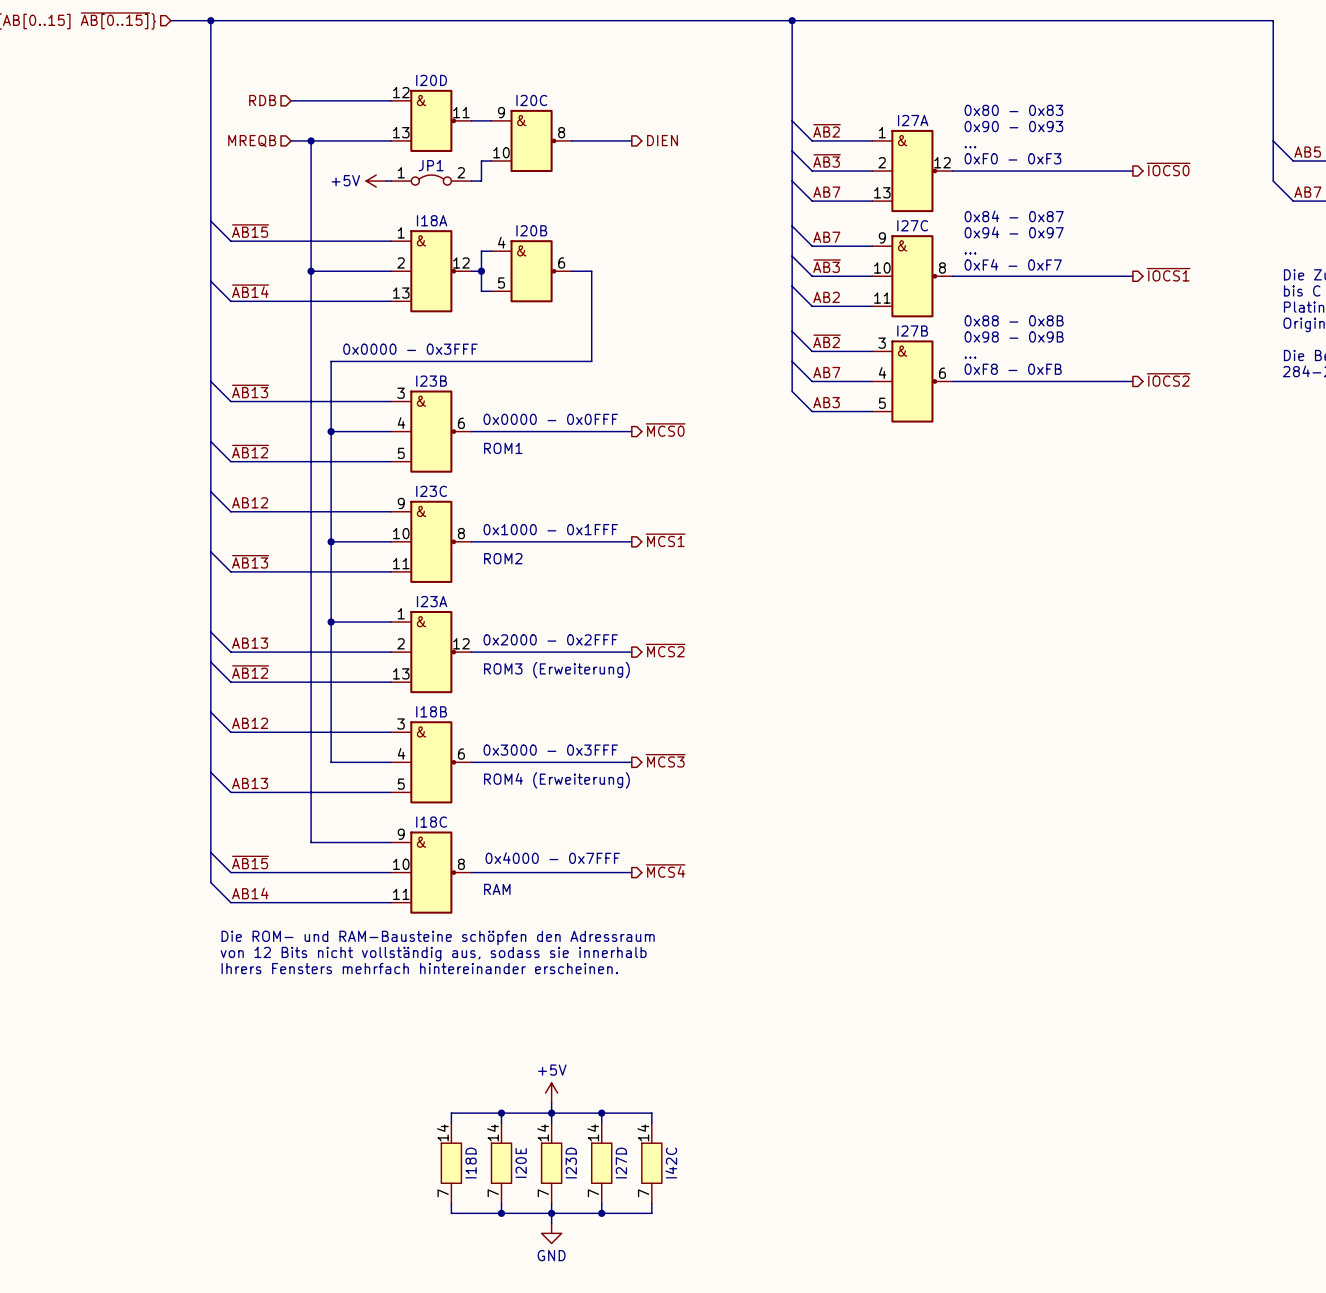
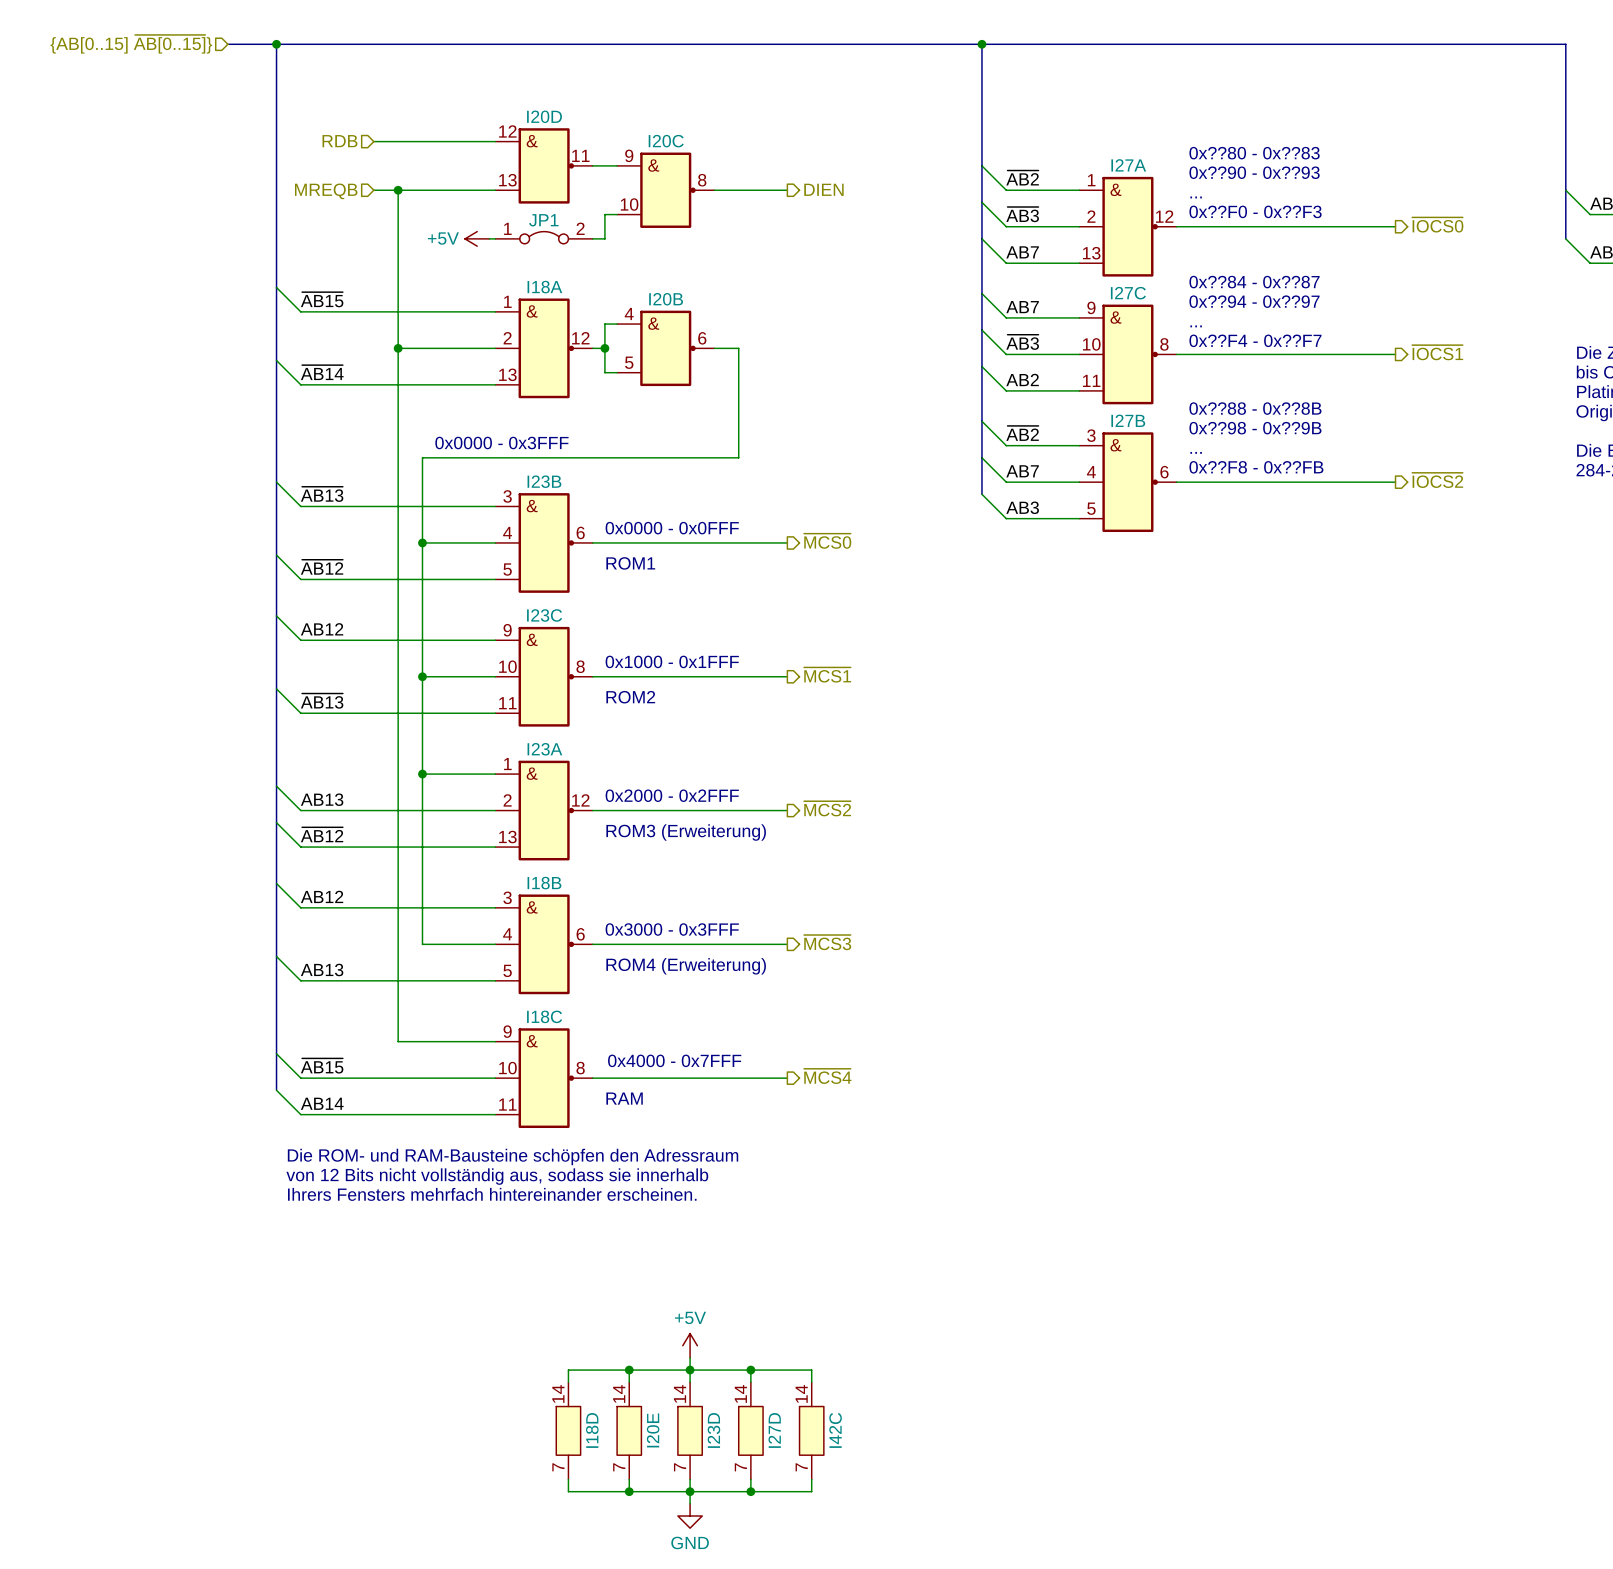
text: 0x80 - 0x83 (1013, 110) -> 0x??80 - 0x??83 (1254, 153)
text: 0x90 - 0x93 (1013, 126) -> 0x??90 - 0x??93 (1254, 172)
text: 0xF0 - 0xF3 (1012, 158) -> 0x??F0 - 0x??F3 (1255, 211)
text: 0x84 - 0x87 (1014, 216) -> 0x??84 - 0x??87 (1254, 282)
text: 0x94 - 0x97 (1014, 232) -> 0x??94 - 0x??97 (1254, 301)
text: 0xF4 - 0xF7 (1013, 264) -> 0x??F4 - 0x??F7 (1255, 340)
text: 0x88 - 0x8B (1014, 320) -> 0x??88 - 0x??8B (1255, 408)
text: 0x98 - 0x9B (1014, 336) -> 0x??98 - 0x??9B (1255, 428)
text: 0xF8 - 0xFB (1013, 369) -> 0x??F8 - 0x??FB (1256, 467)

